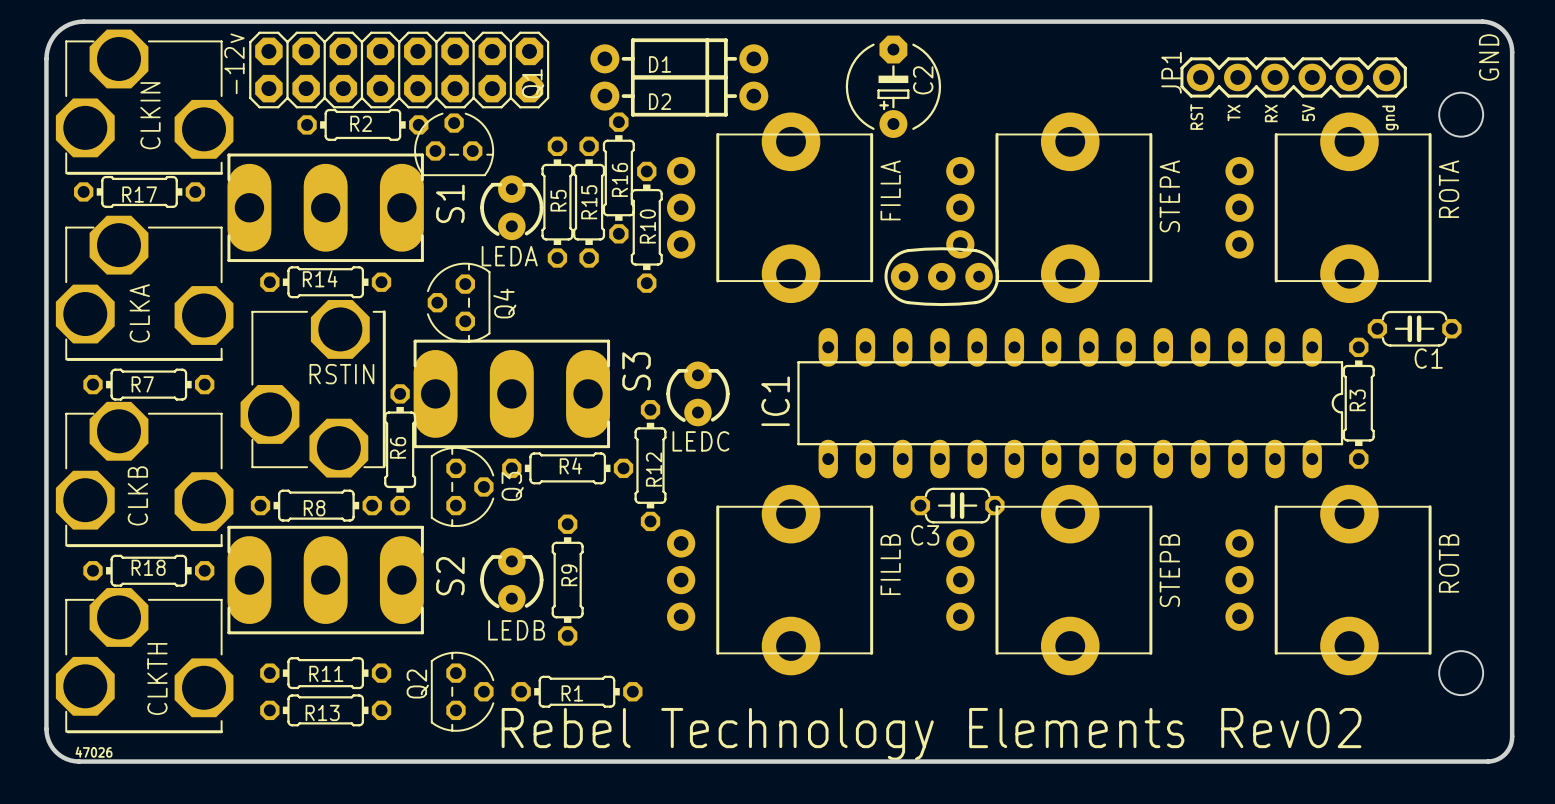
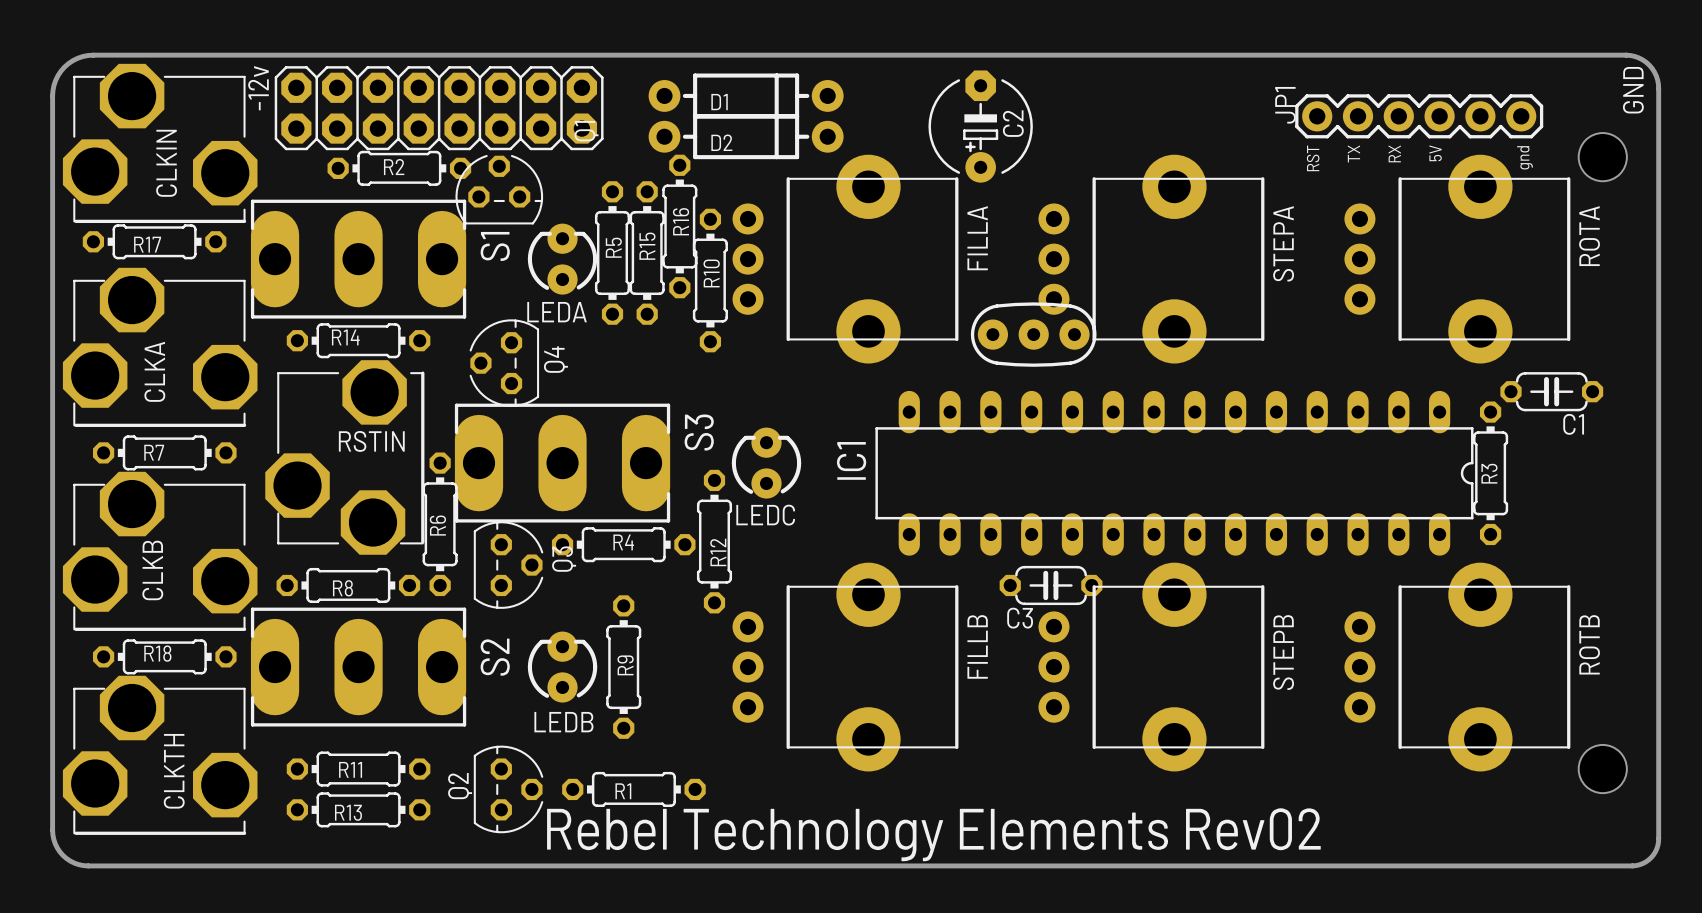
text: 47026 (93, 752) -> none

